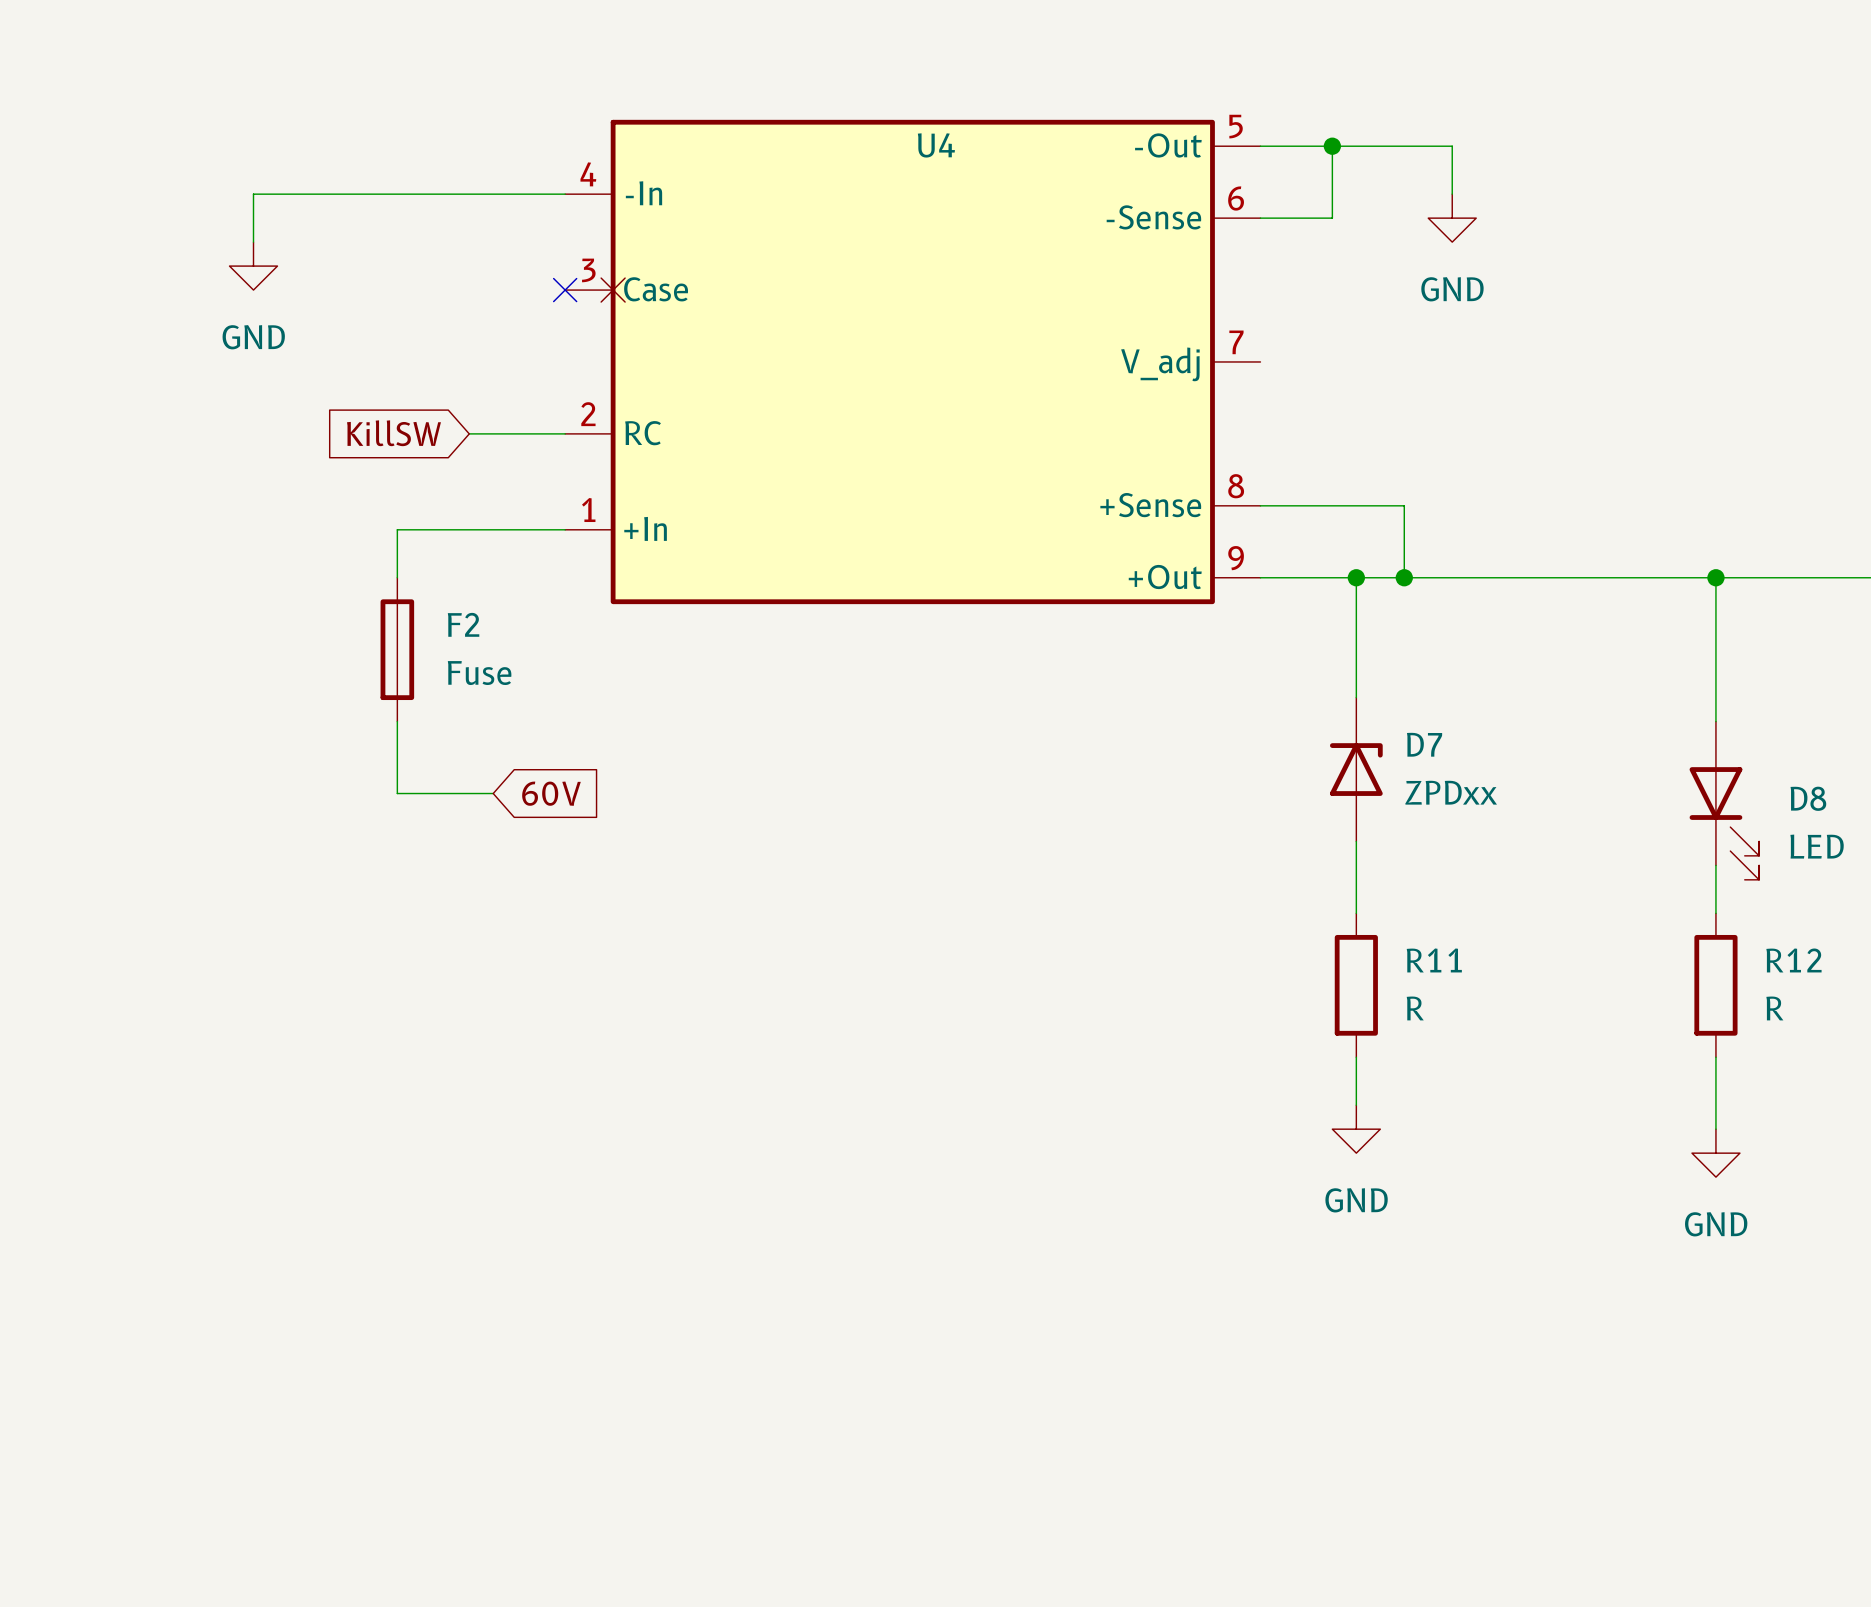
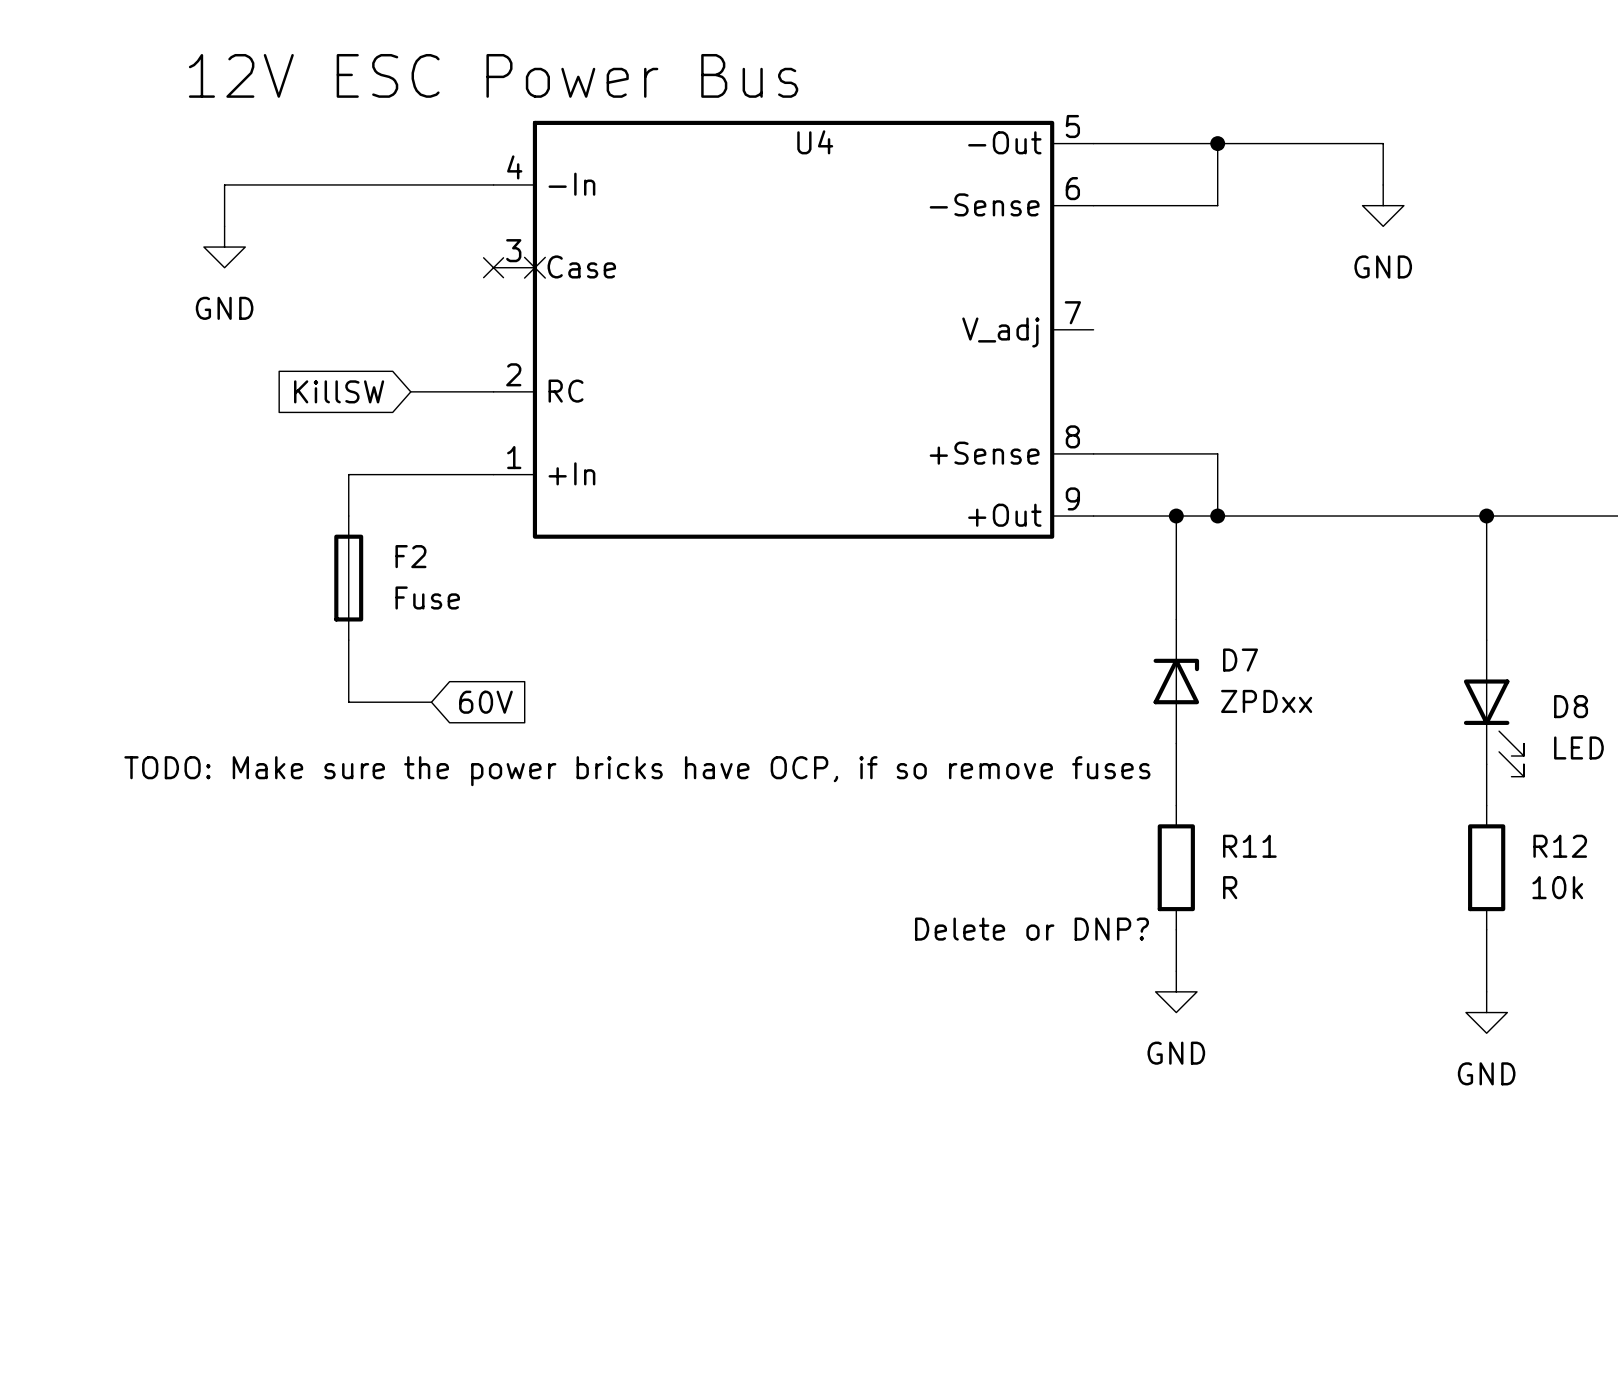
text: none -> 12V ESC Power Bus (493, 75)
wire: (1332, 146) (1332, 218) -> (1217, 143) (1217, 205) (1155, 205)
junction position: (1332, 146) -> (1217, 143)
wire: (1452, 146) (1452, 194) -> (1259, 143) (1383, 143) (1383, 184)
power symbol position: GND (1452, 218) -> GND (1383, 205)
text: none -> TODO: Make sure the power bricks have OCP, if so remove fuses (637, 771)
R12 value: R (1774, 1008) -> 10k (1557, 887)
text: none -> Delete or DNP? (1031, 929)

